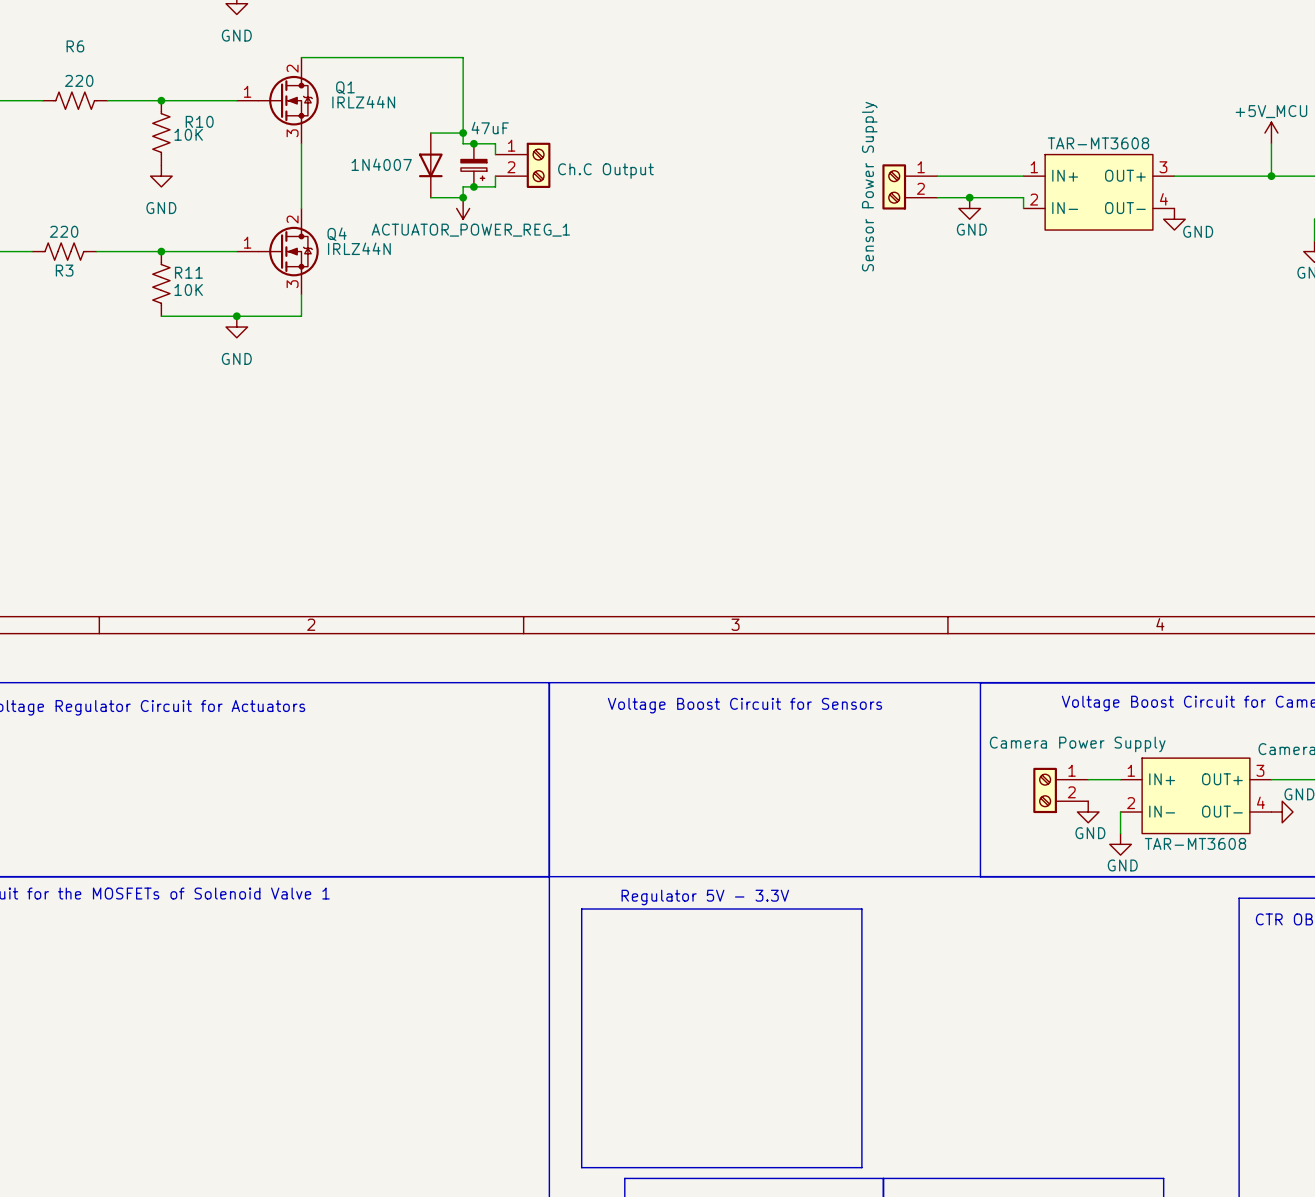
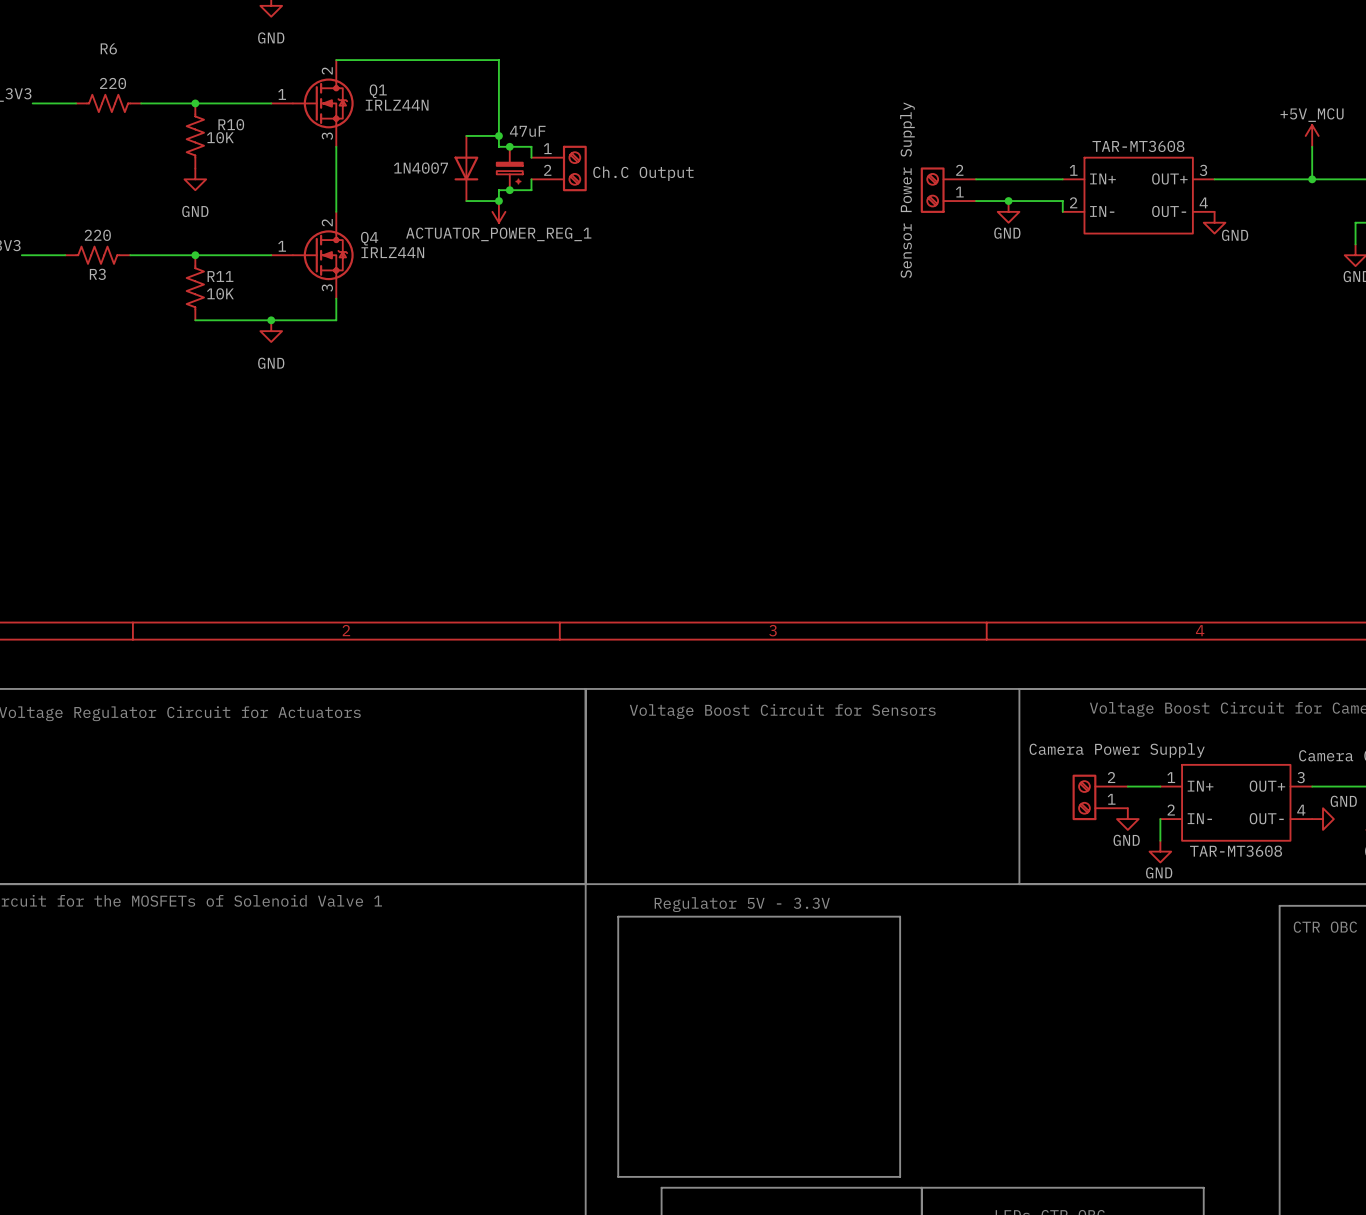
part pin number: 1 (921, 167) -> 2 (959, 170)
part pin number: 2 (920, 188) -> 1 (959, 192)
part pin number: 1 (1072, 770) -> 2 (1111, 777)
part pin number: 2 (1071, 792) -> 1 (1111, 799)

